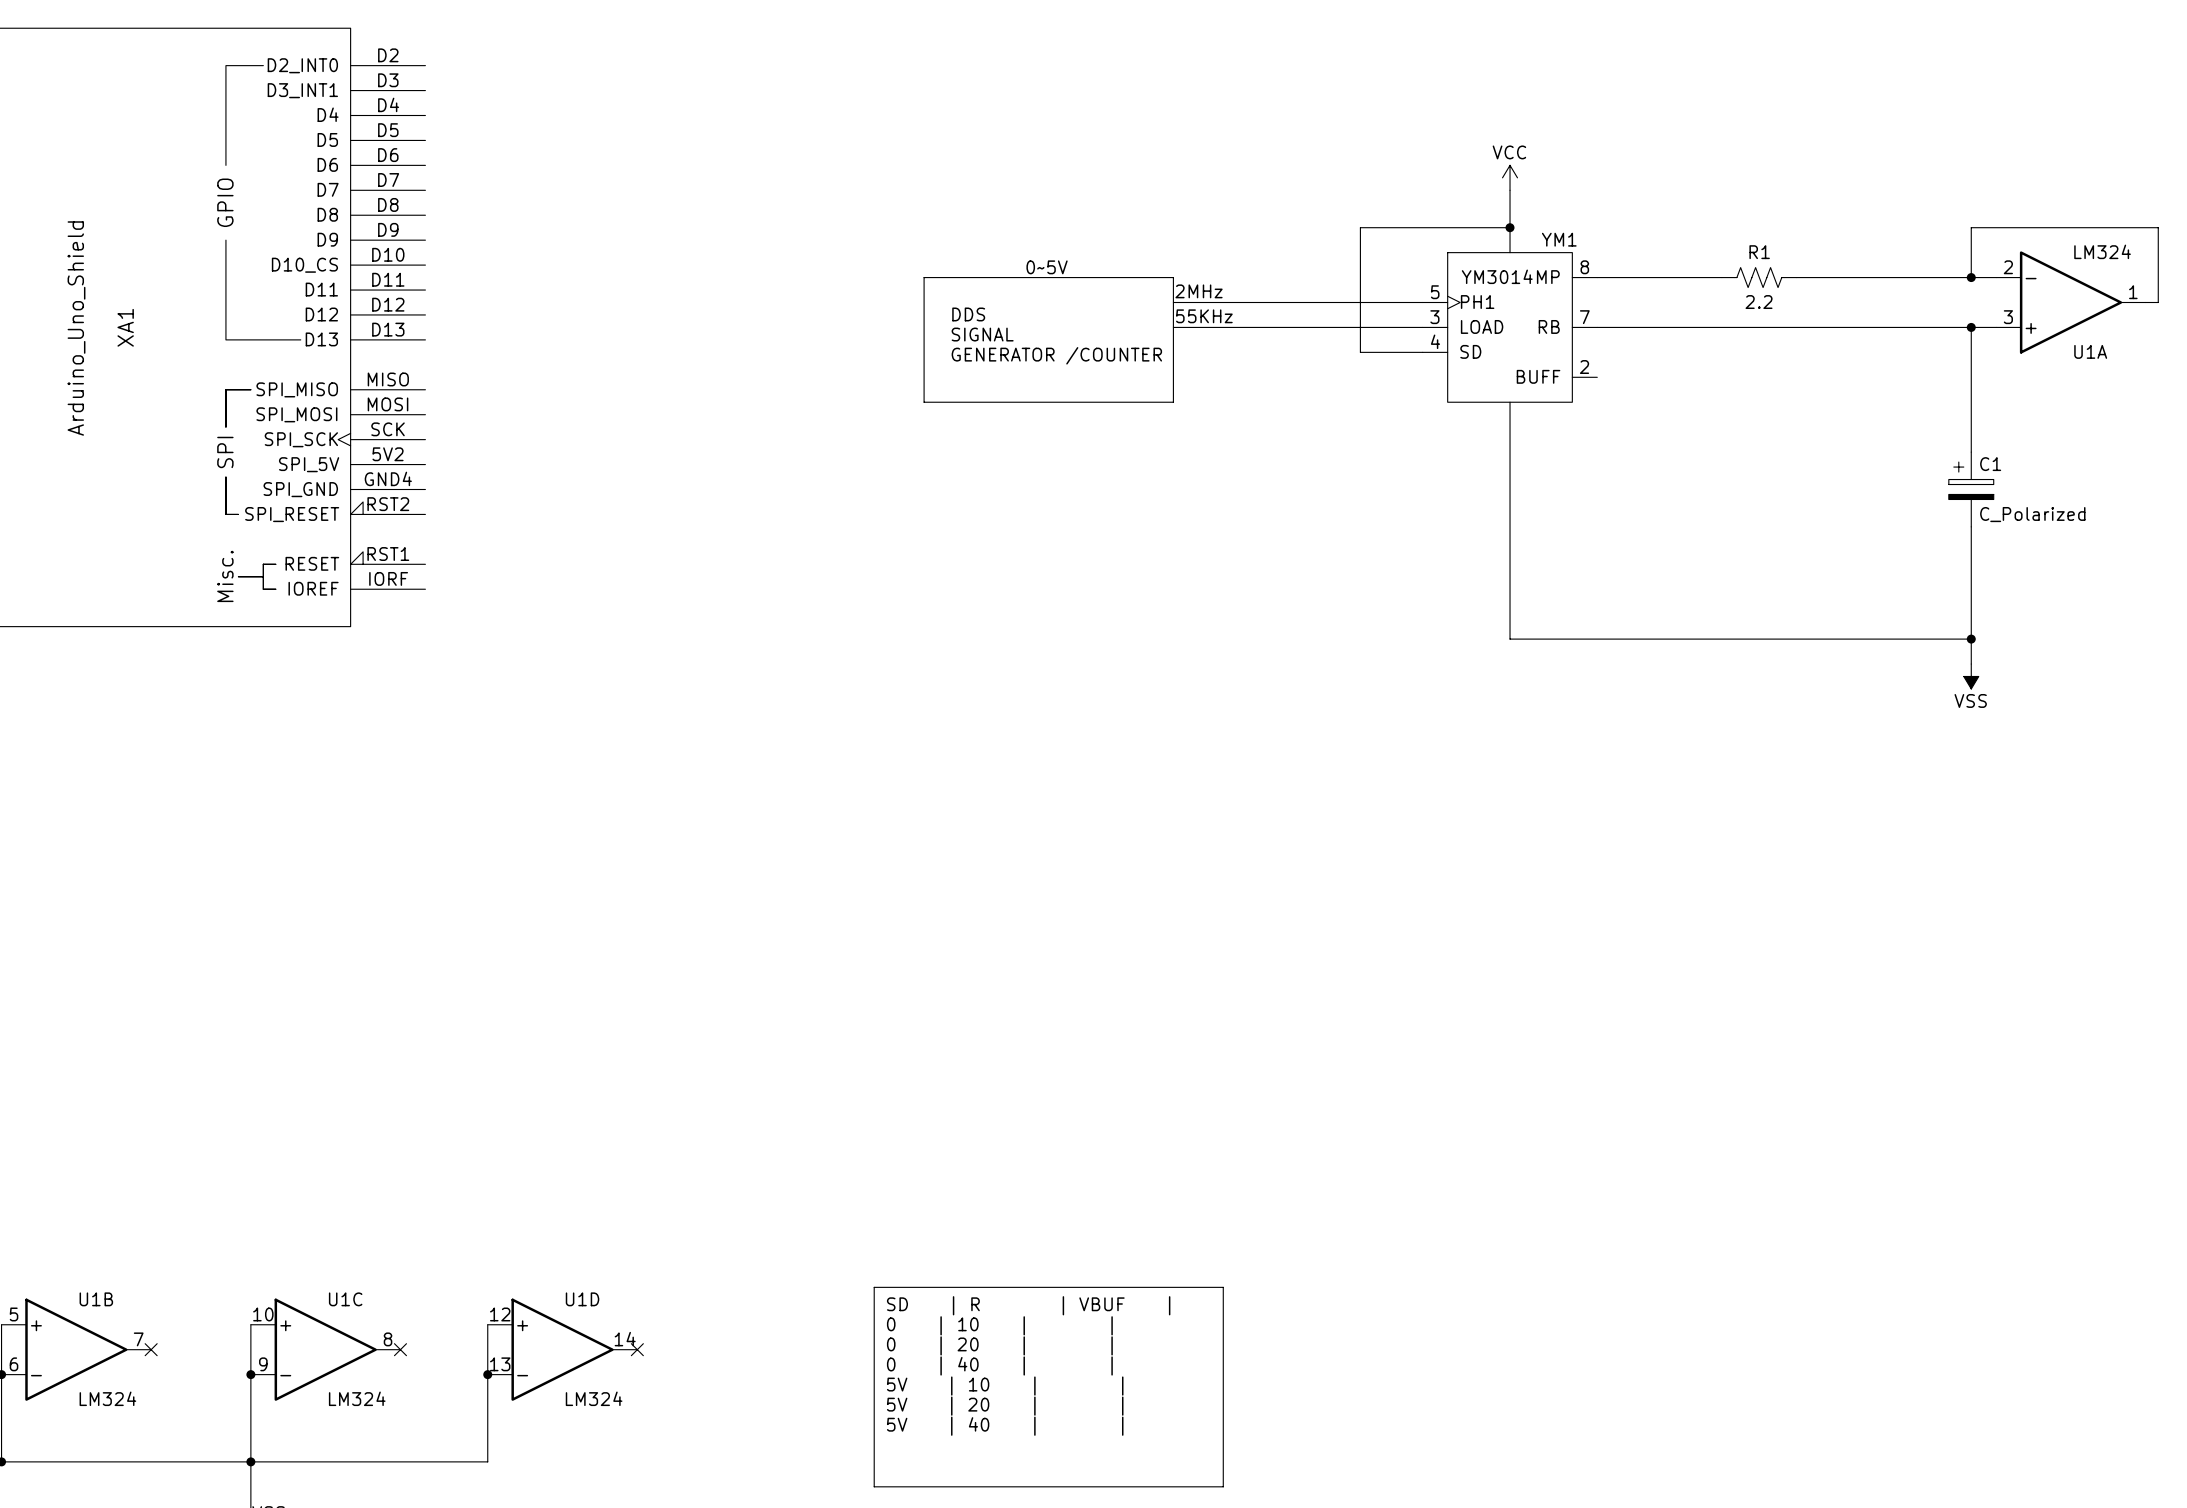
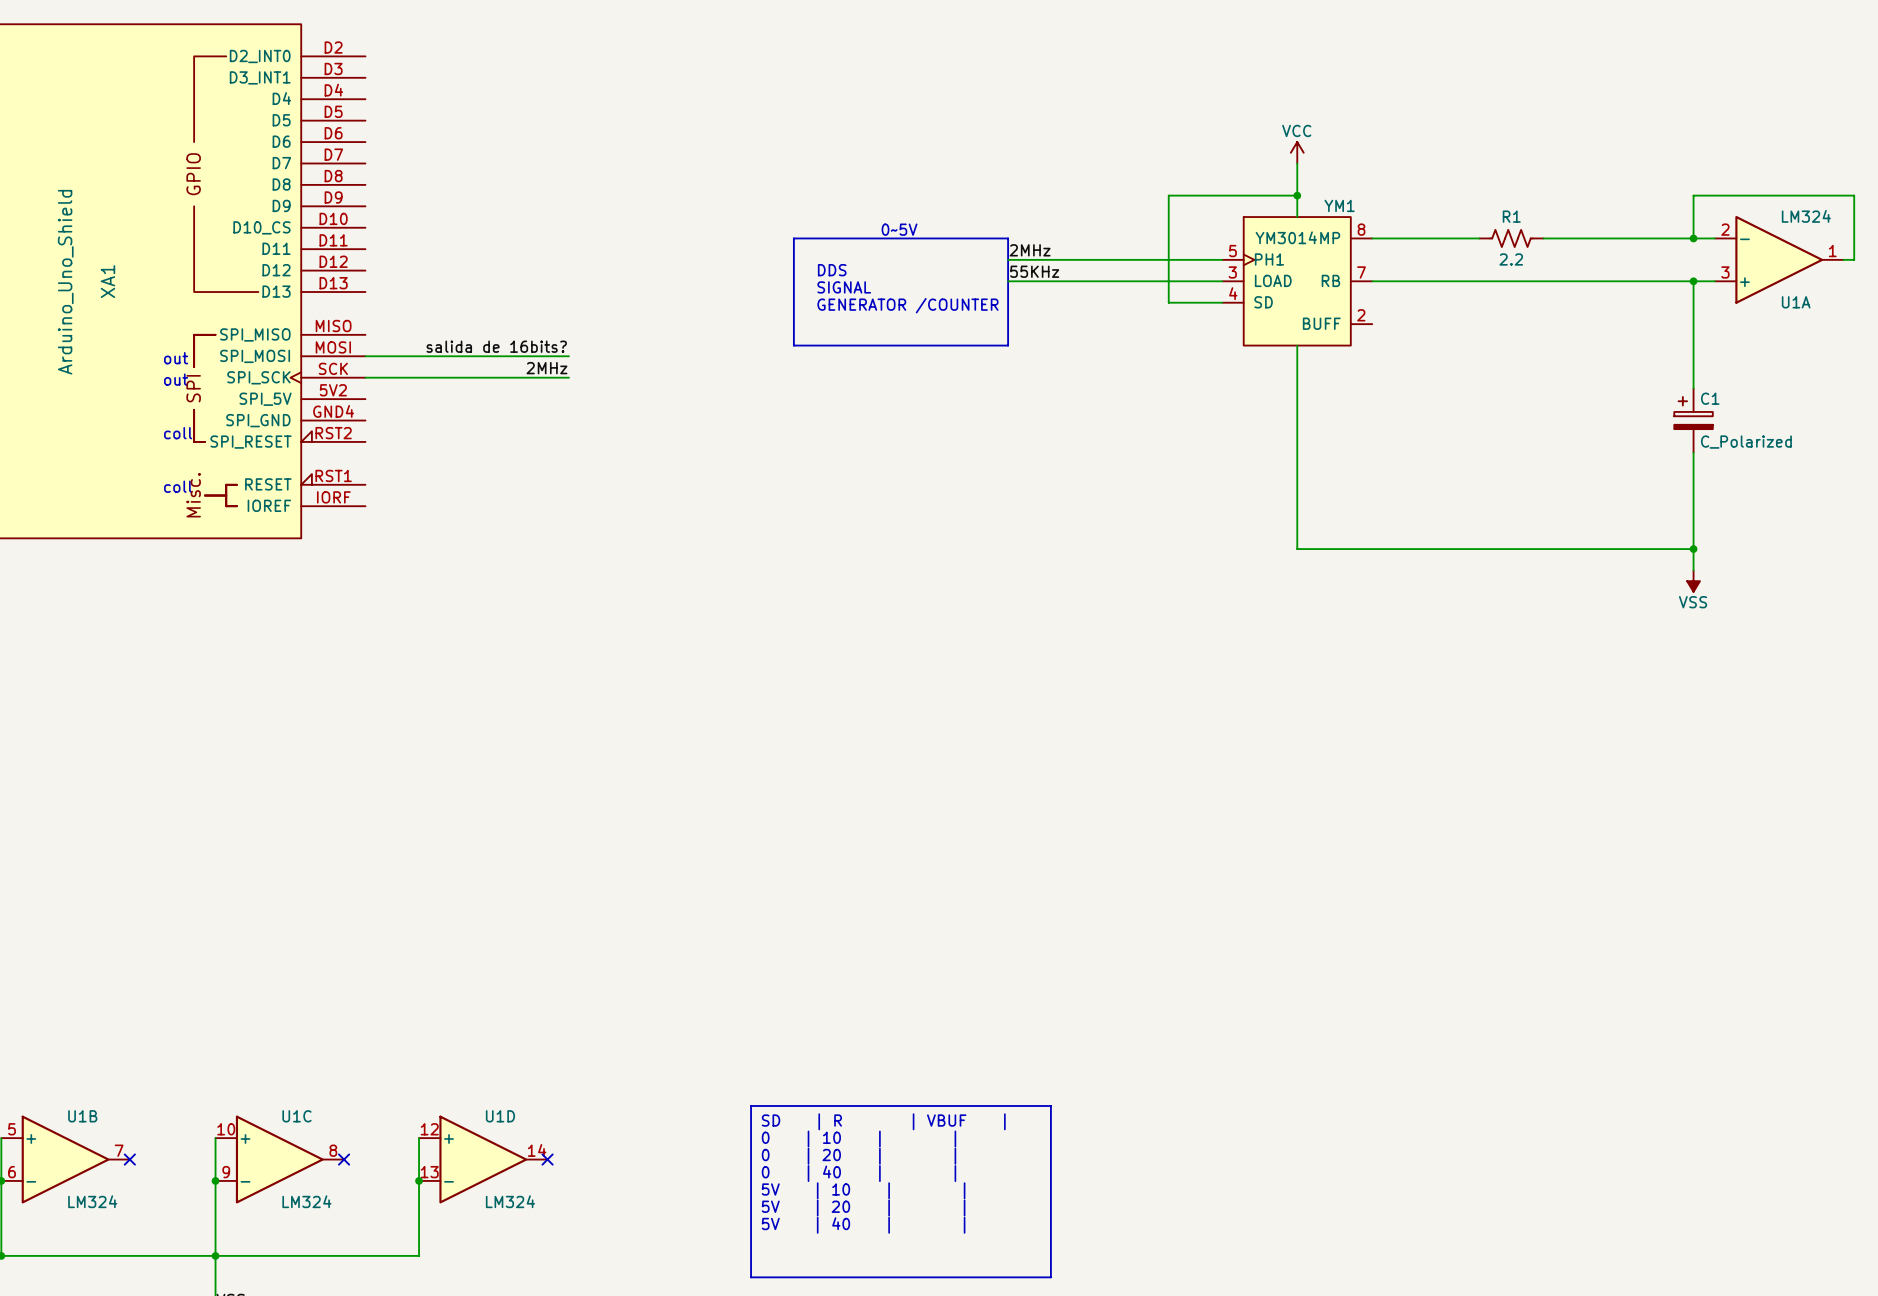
label: none -> salida de 16bits? (496, 346)
wire: none -> (365, 356) (568, 356)
text: none -> out (176, 358)
label: none -> 2MHz (546, 368)
wire: none -> (365, 377) (568, 377)
text: none -> out (176, 379)
text: none -> coll (178, 433)
text: none -> coll (178, 486)

